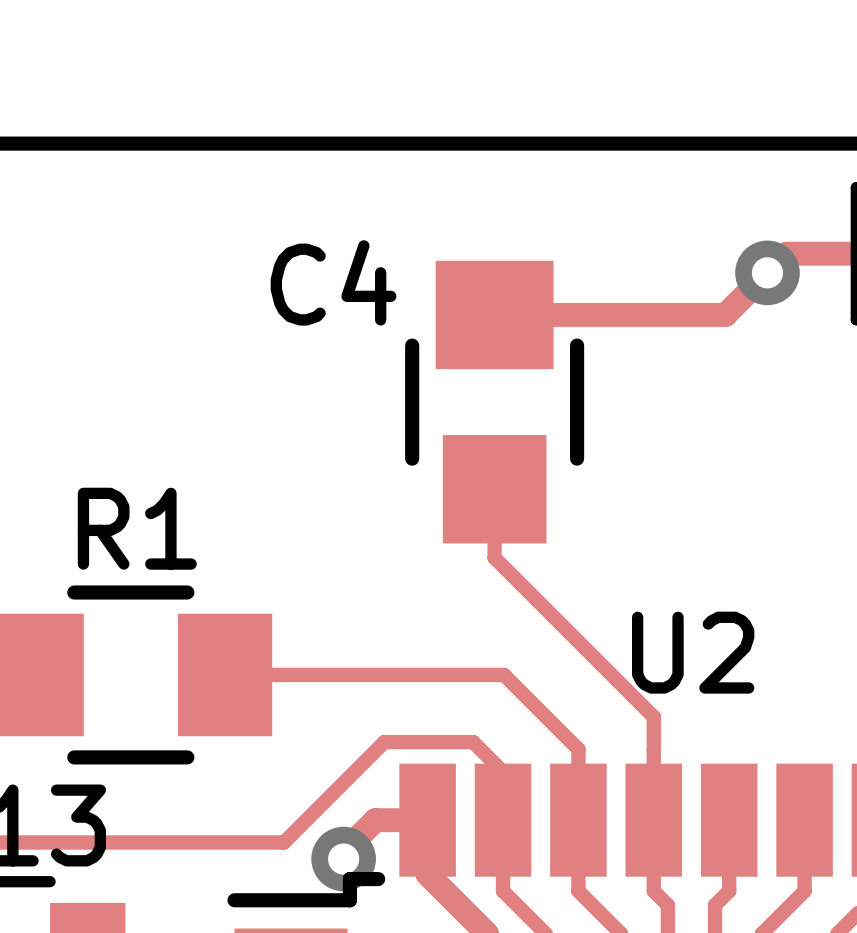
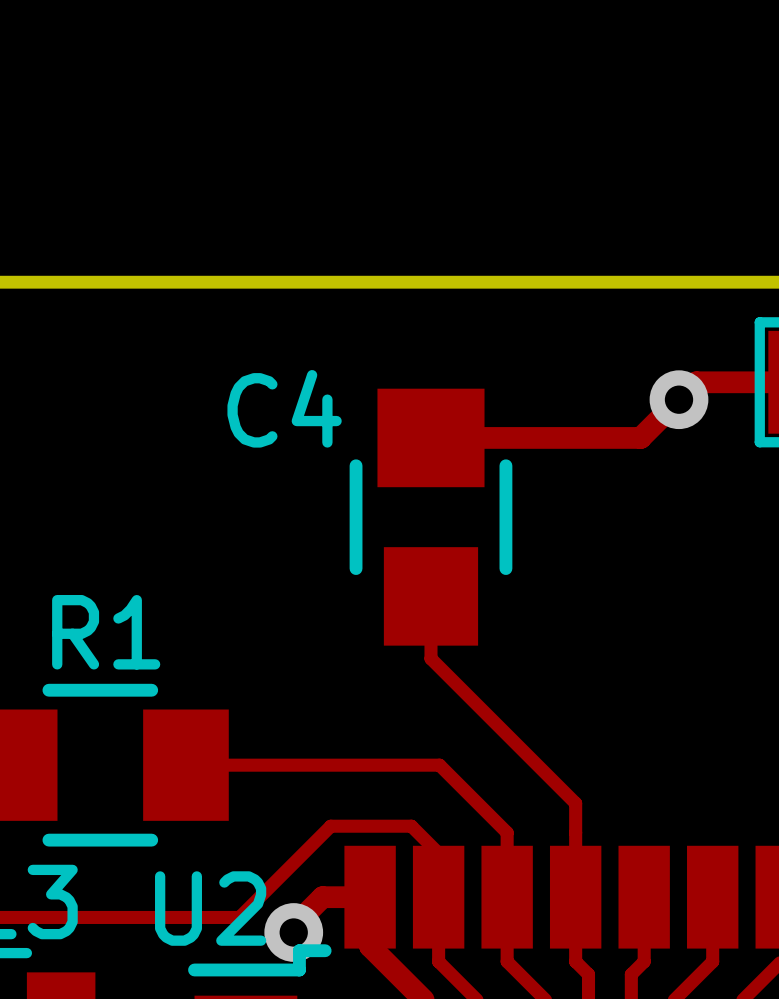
U2 name position: U2 (693, 652) -> U2 (210, 908)

